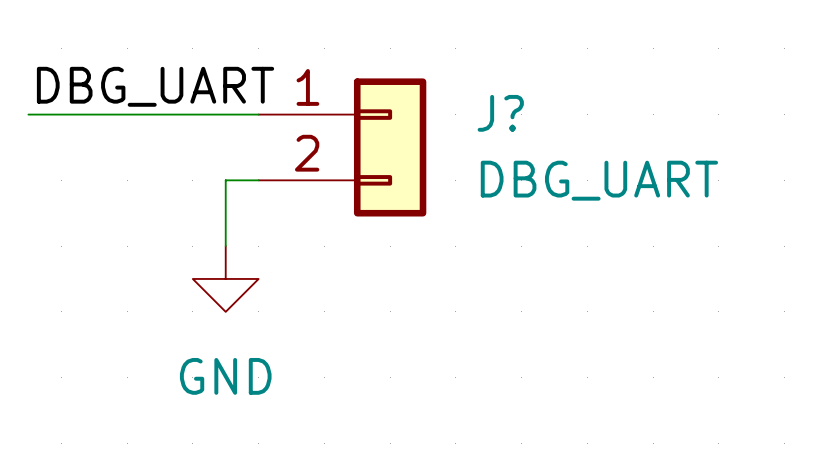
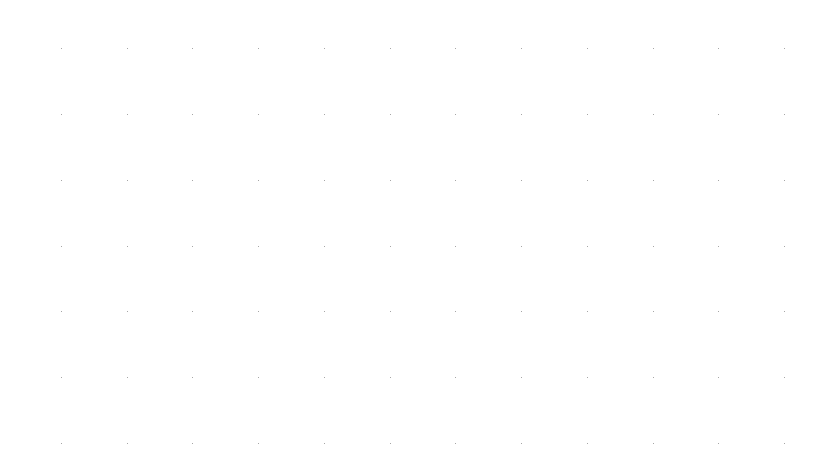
label: DBG_UART (155, 86) -> none
wire: (28, 114) (258, 114) -> none
J?: DBG_UART (342, 147) -> none
wire: (258, 180) (225, 180) (225, 246) -> none
power symbol: GND (225, 278) -> none

